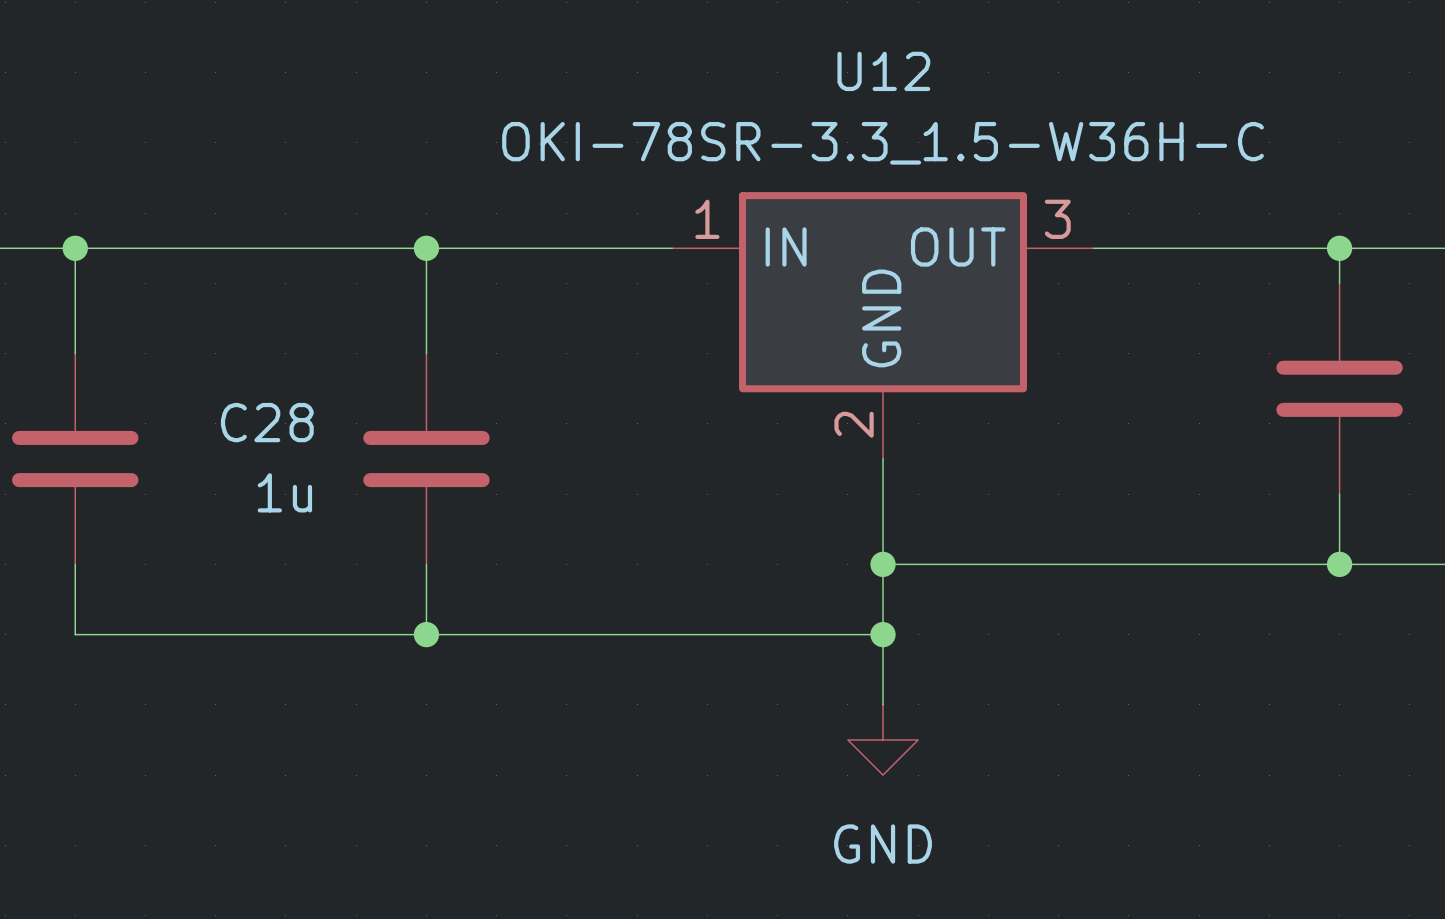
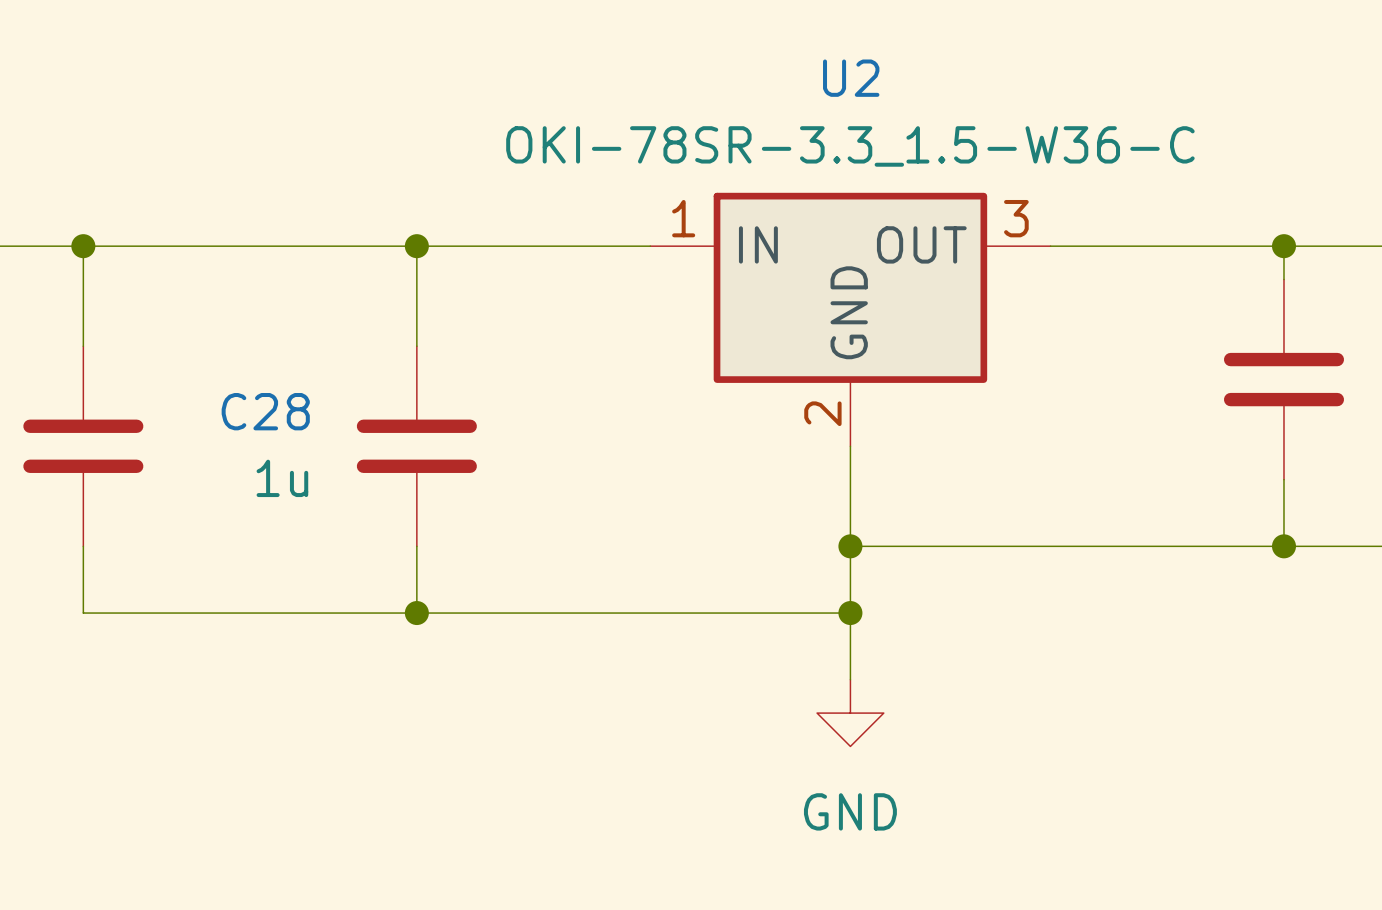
U12 name: U12 (883, 71) -> U2 (851, 78)
U12 value: OKI-78SR-3.3_1.5-W36H-C (883, 143) -> OKI-78SR-3.3_1.5-W36-C (850, 146)

